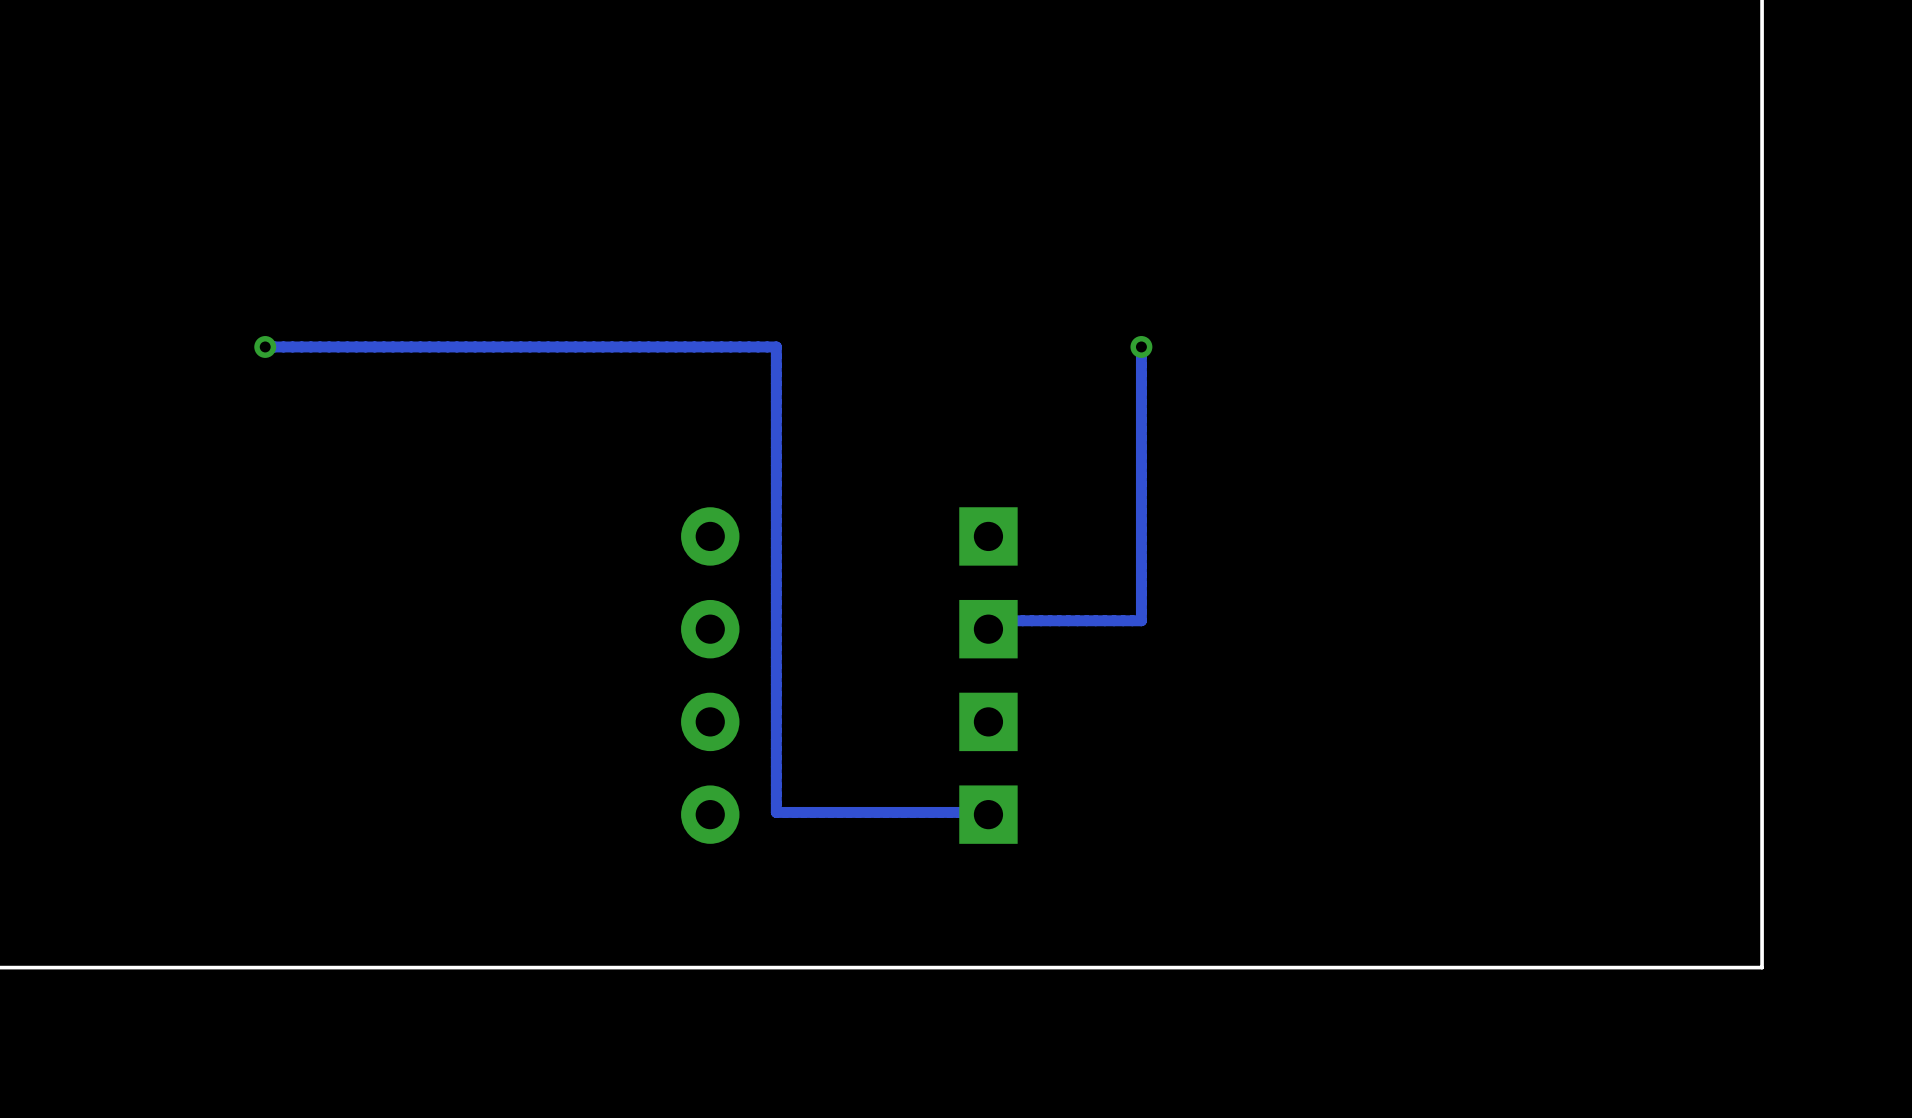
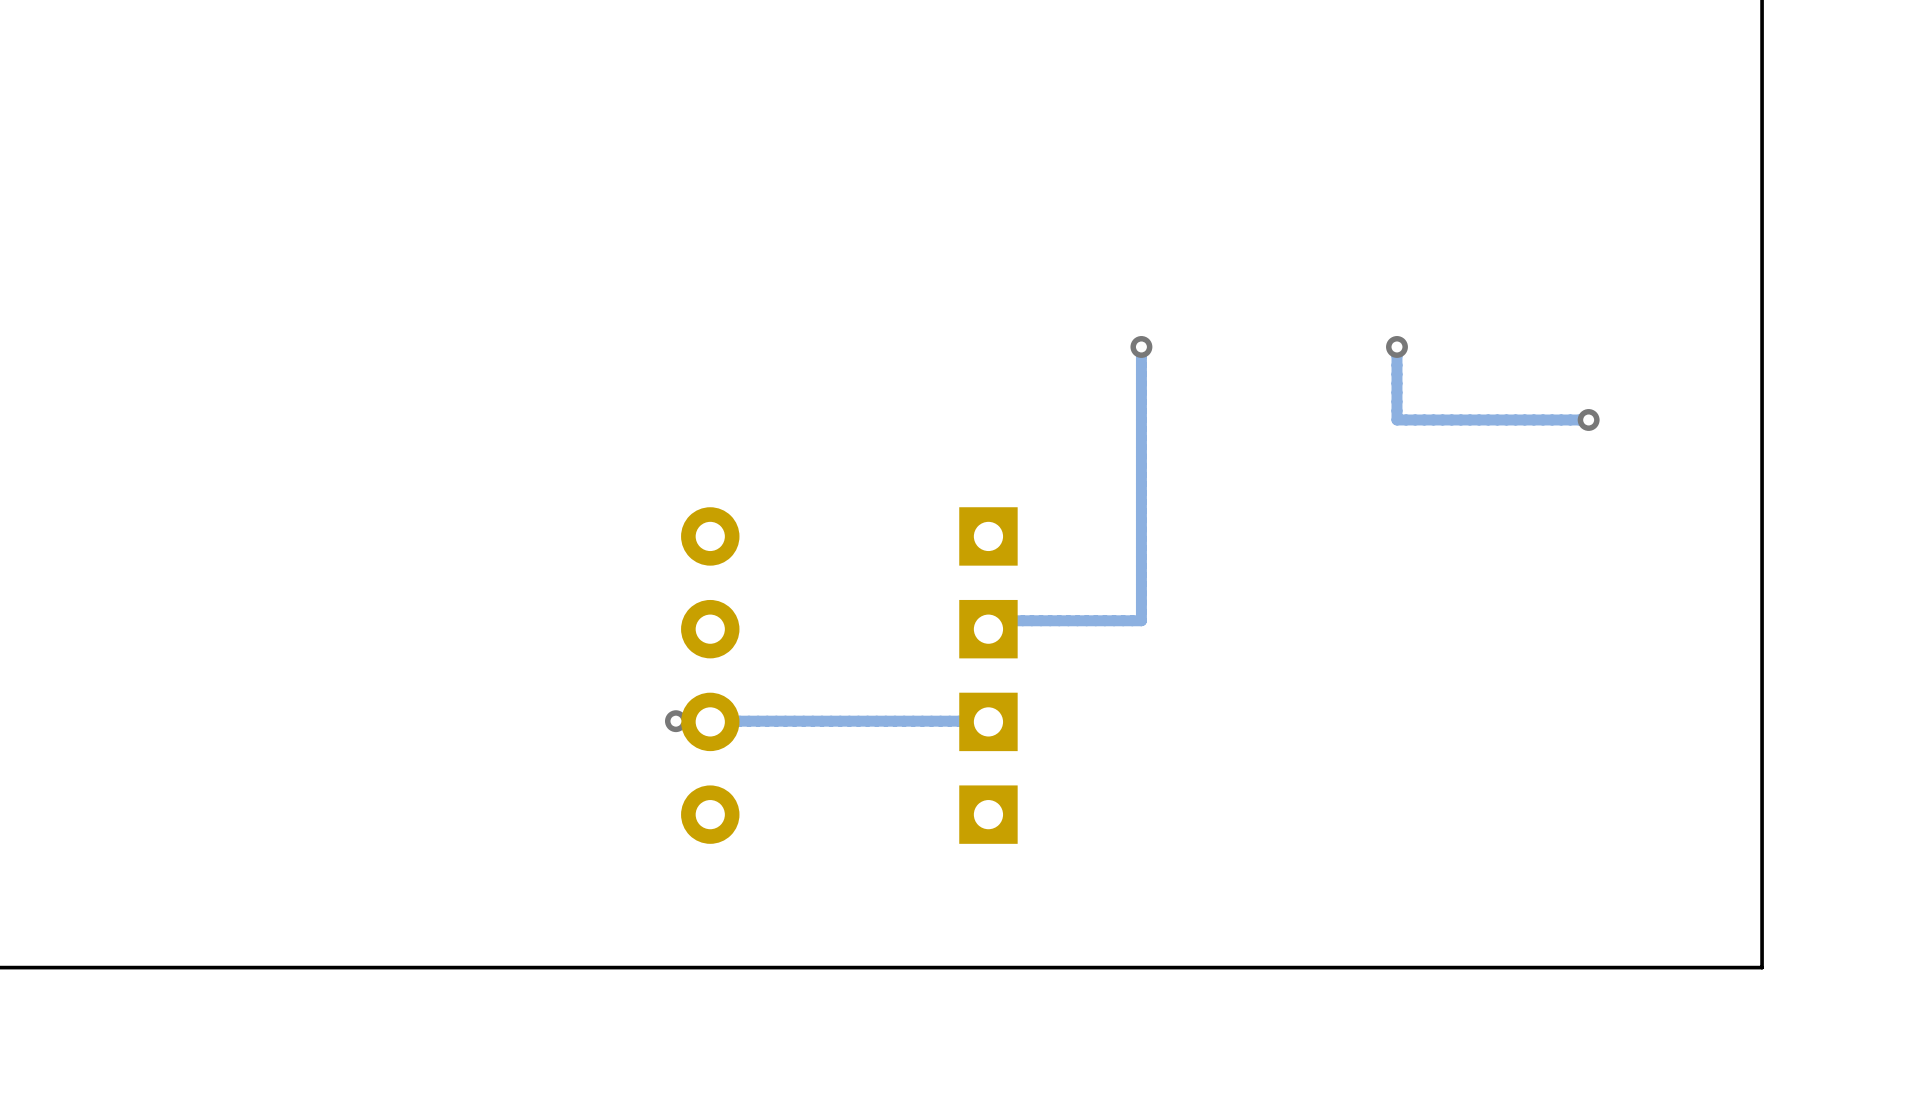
track: (265, 346) (776, 346) (776, 812) (995, 812) (988, 814) -> none
via: (265, 346) -> none
track: none -> (1396, 346) (1396, 419) (1588, 419)
via: none -> (1396, 346)
via: none -> (1588, 419)
track: none -> (675, 721) (995, 721) (988, 721)
via: none -> (675, 721)

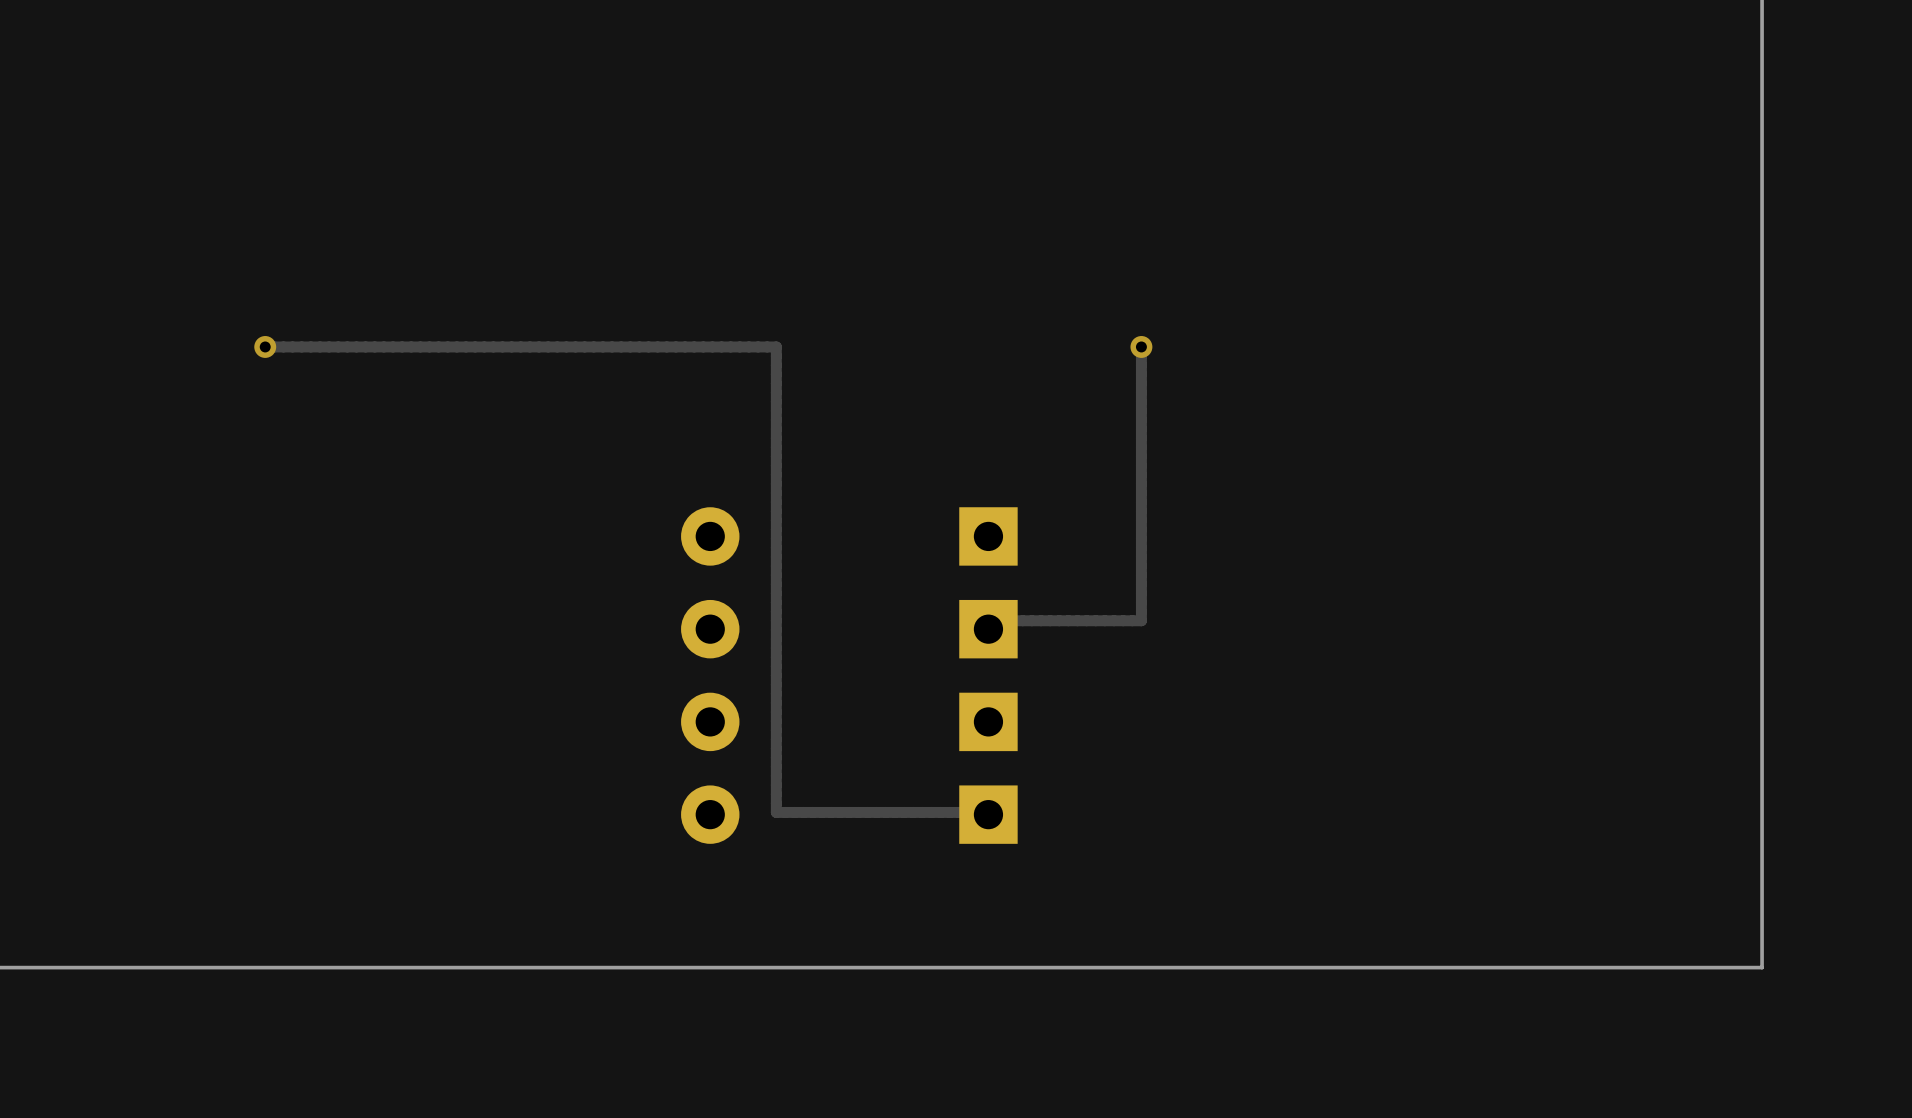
track: none -> (265, 346) (776, 346) (776, 812) (995, 812) (988, 814)
via: none -> (265, 346)
track: (1396, 346) (1396, 419) (1588, 419) -> none
via: (1396, 346) -> none
via: (1588, 419) -> none
track: (675, 721) (995, 721) (988, 721) -> none
via: (675, 721) -> none

